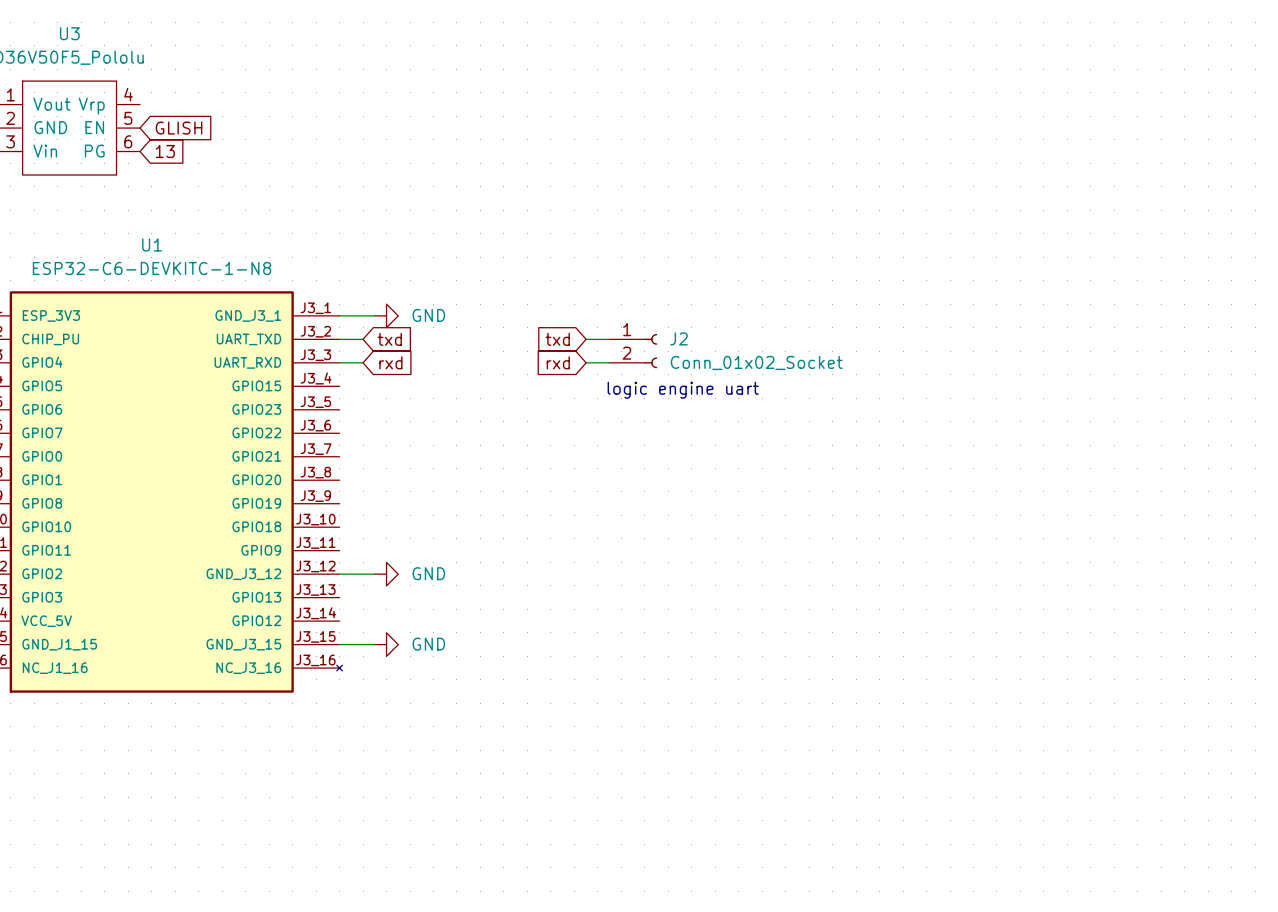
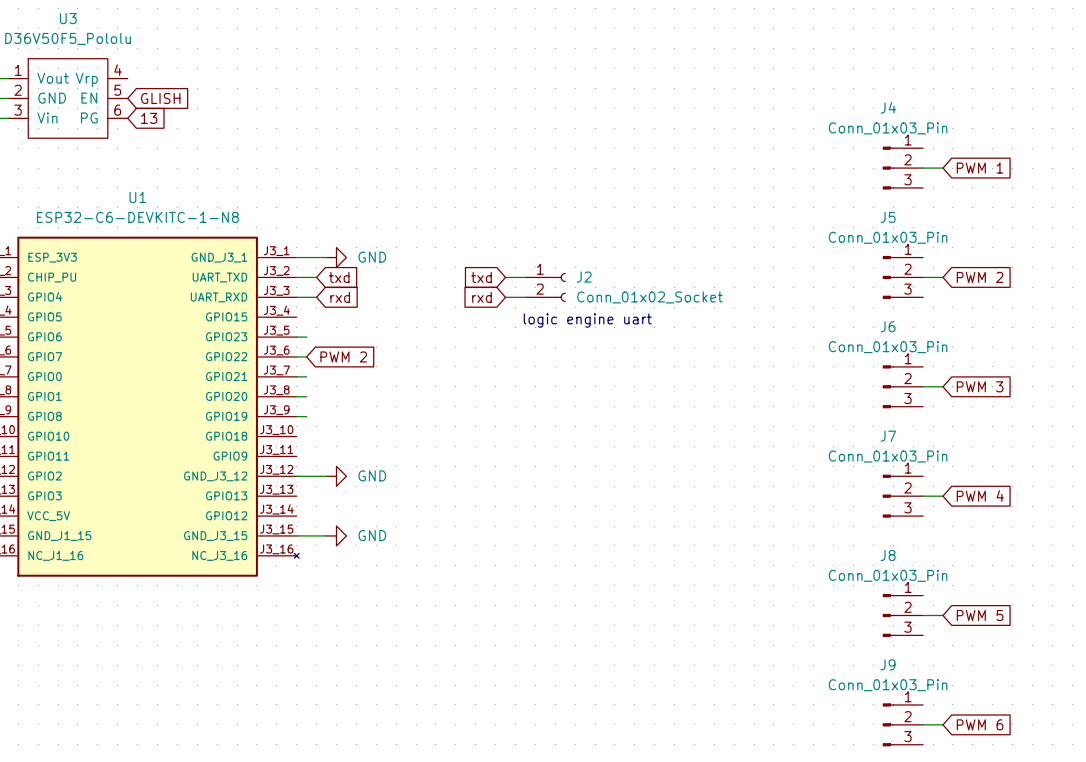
J4: none -> Conn_01x03_Pin (902, 168)
wire: none -> (923, 168) (943, 168)
global label: none -> PWM 1 (980, 168)
J5: none -> Conn_01x03_Pin (902, 277)
wire: none -> (923, 277) (943, 277)
global label: none -> PWM 2 (980, 277)
wire: none -> (296, 337) (306, 337)
wire: none -> (296, 356) (306, 356)
global label: none -> PWM 2 (343, 356)
wire: none -> (296, 376) (306, 376)
J6: none -> Conn_01x03_Pin (902, 386)
wire: none -> (923, 386) (943, 386)
global label: none -> PWM 3 (980, 386)
wire: none -> (296, 396) (306, 396)
wire: none -> (296, 416) (306, 416)
J7: none -> Conn_01x03_Pin (902, 496)
wire: none -> (923, 496) (943, 496)
global label: none -> PWM 4 (980, 495)
J8: none -> Conn_01x03_Pin (902, 615)
wire: none -> (923, 615) (943, 615)
global label: none -> PWM 5 (980, 615)
J9: none -> Conn_01x03_Pin (902, 724)
wire: none -> (923, 724) (943, 724)
global label: none -> PWM 6 (980, 724)

